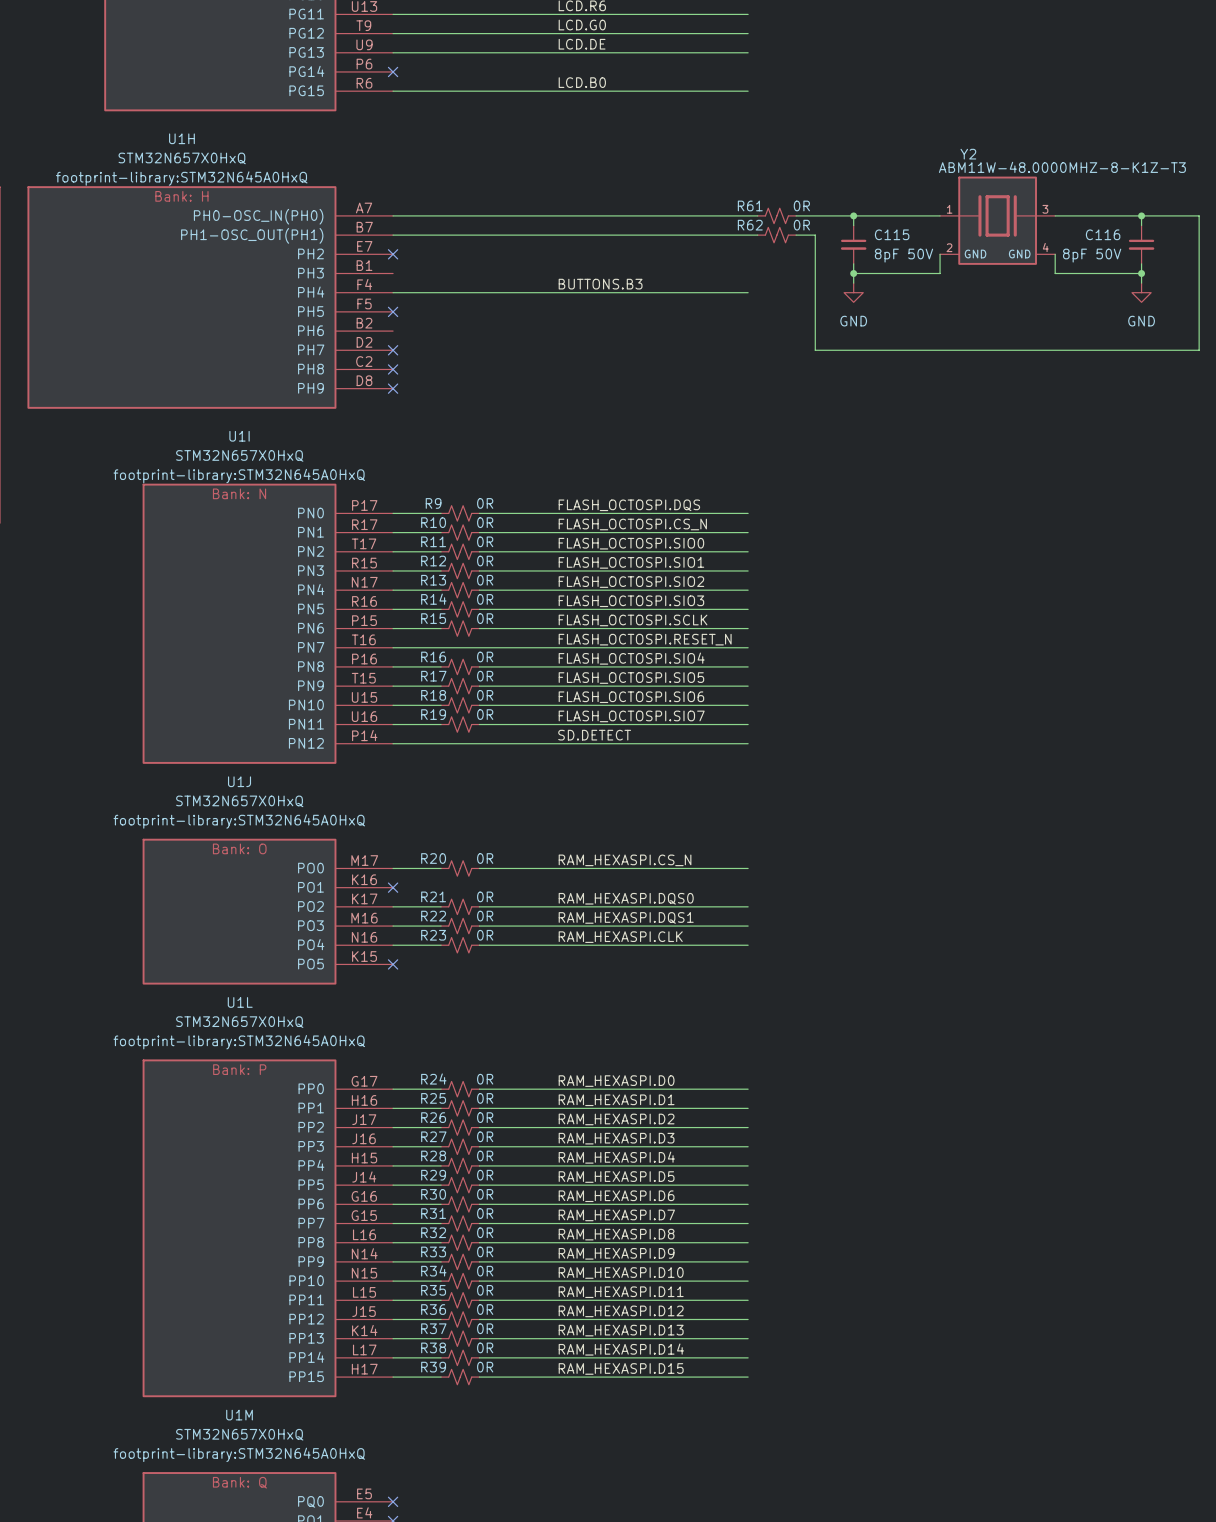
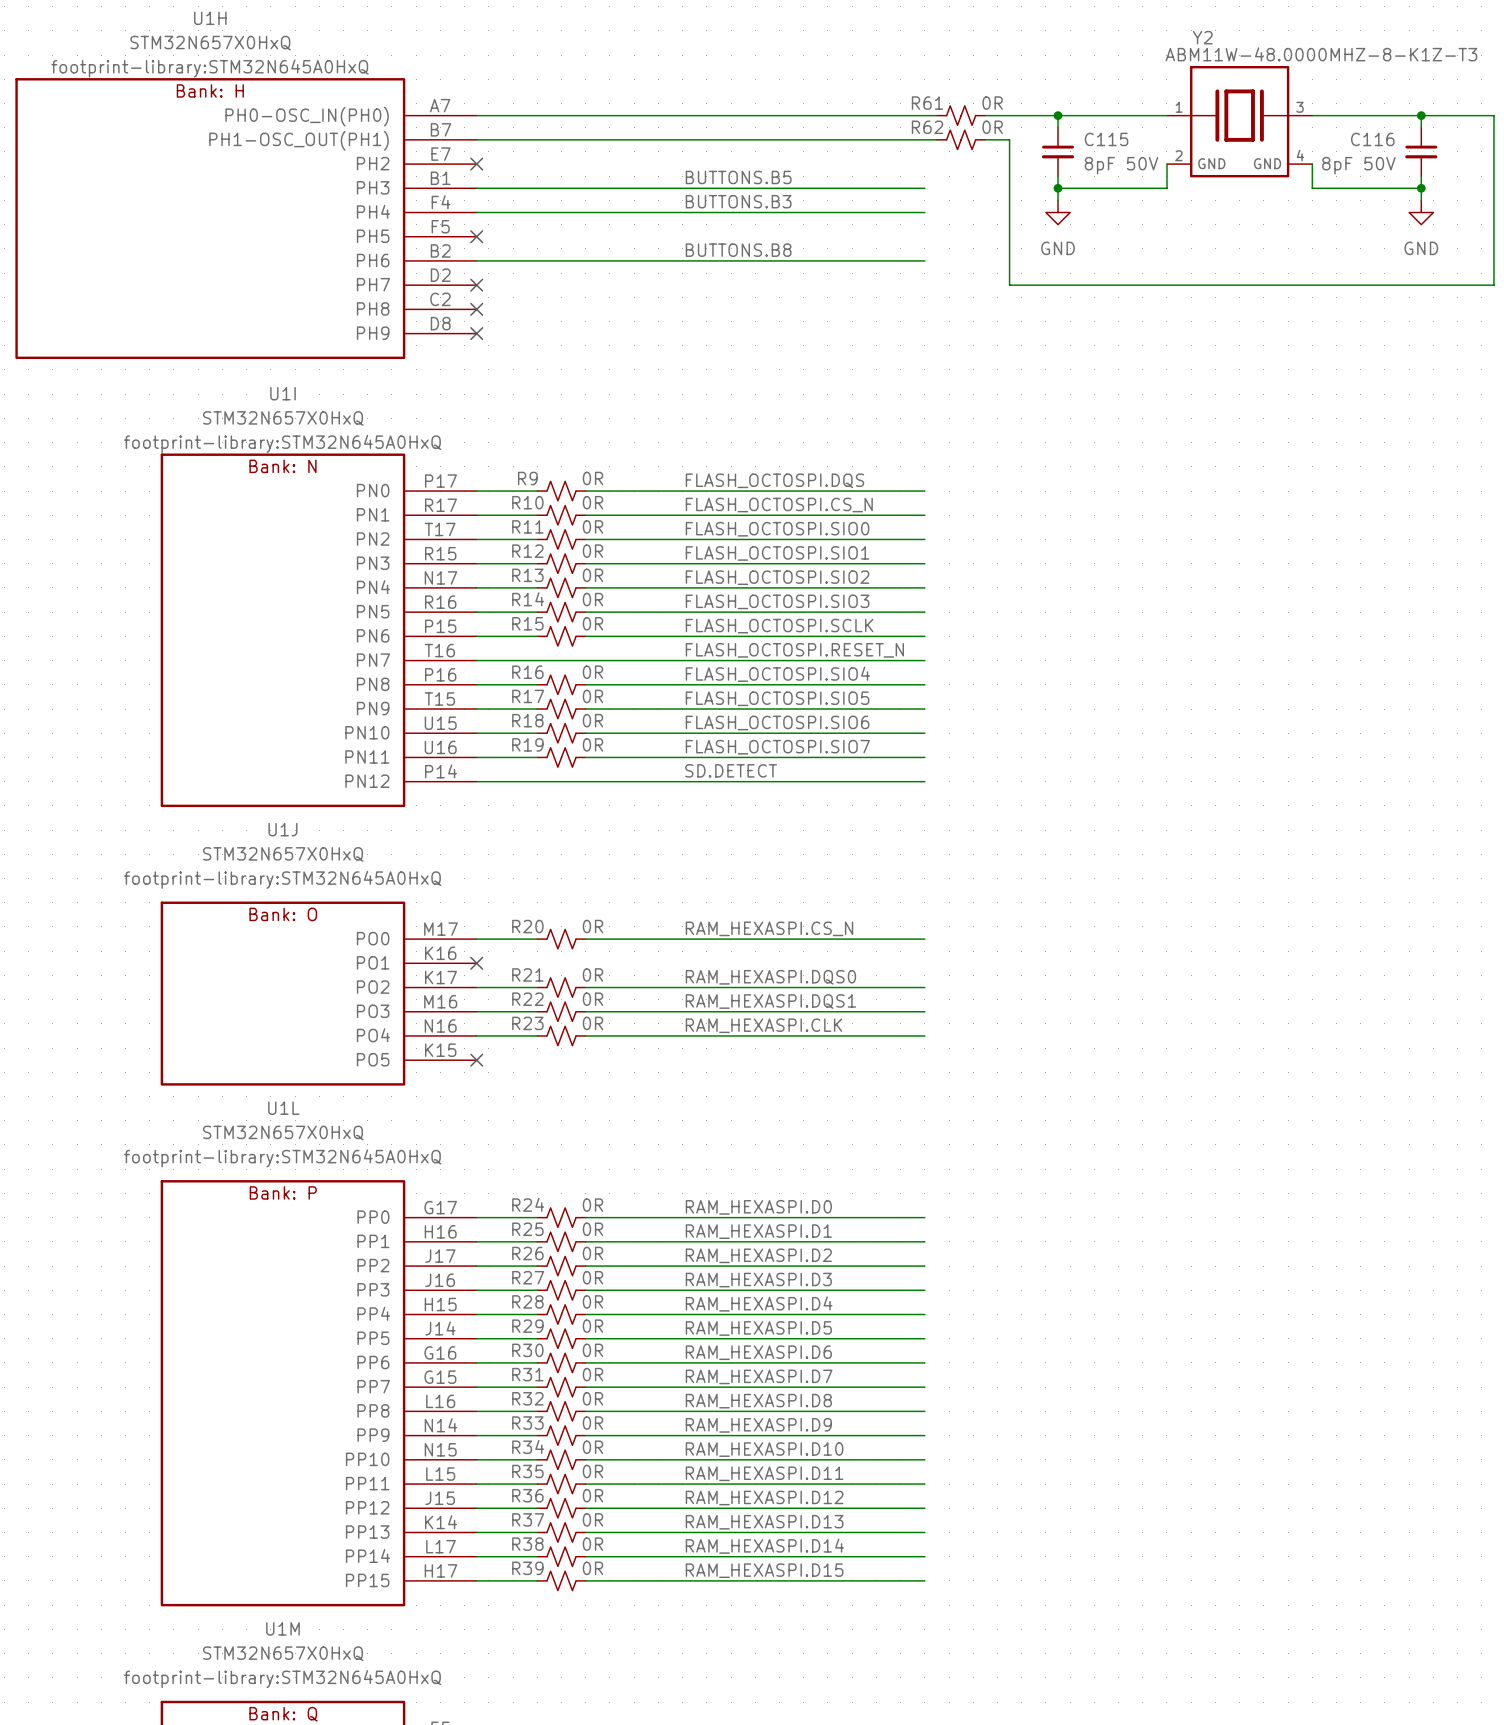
label: none -> BUTTONS.B5 (738, 177)
wire: none -> (476, 188) (924, 188)
label: none -> BUTTONS.B8 (738, 250)
wire: none -> (476, 260) (924, 260)

